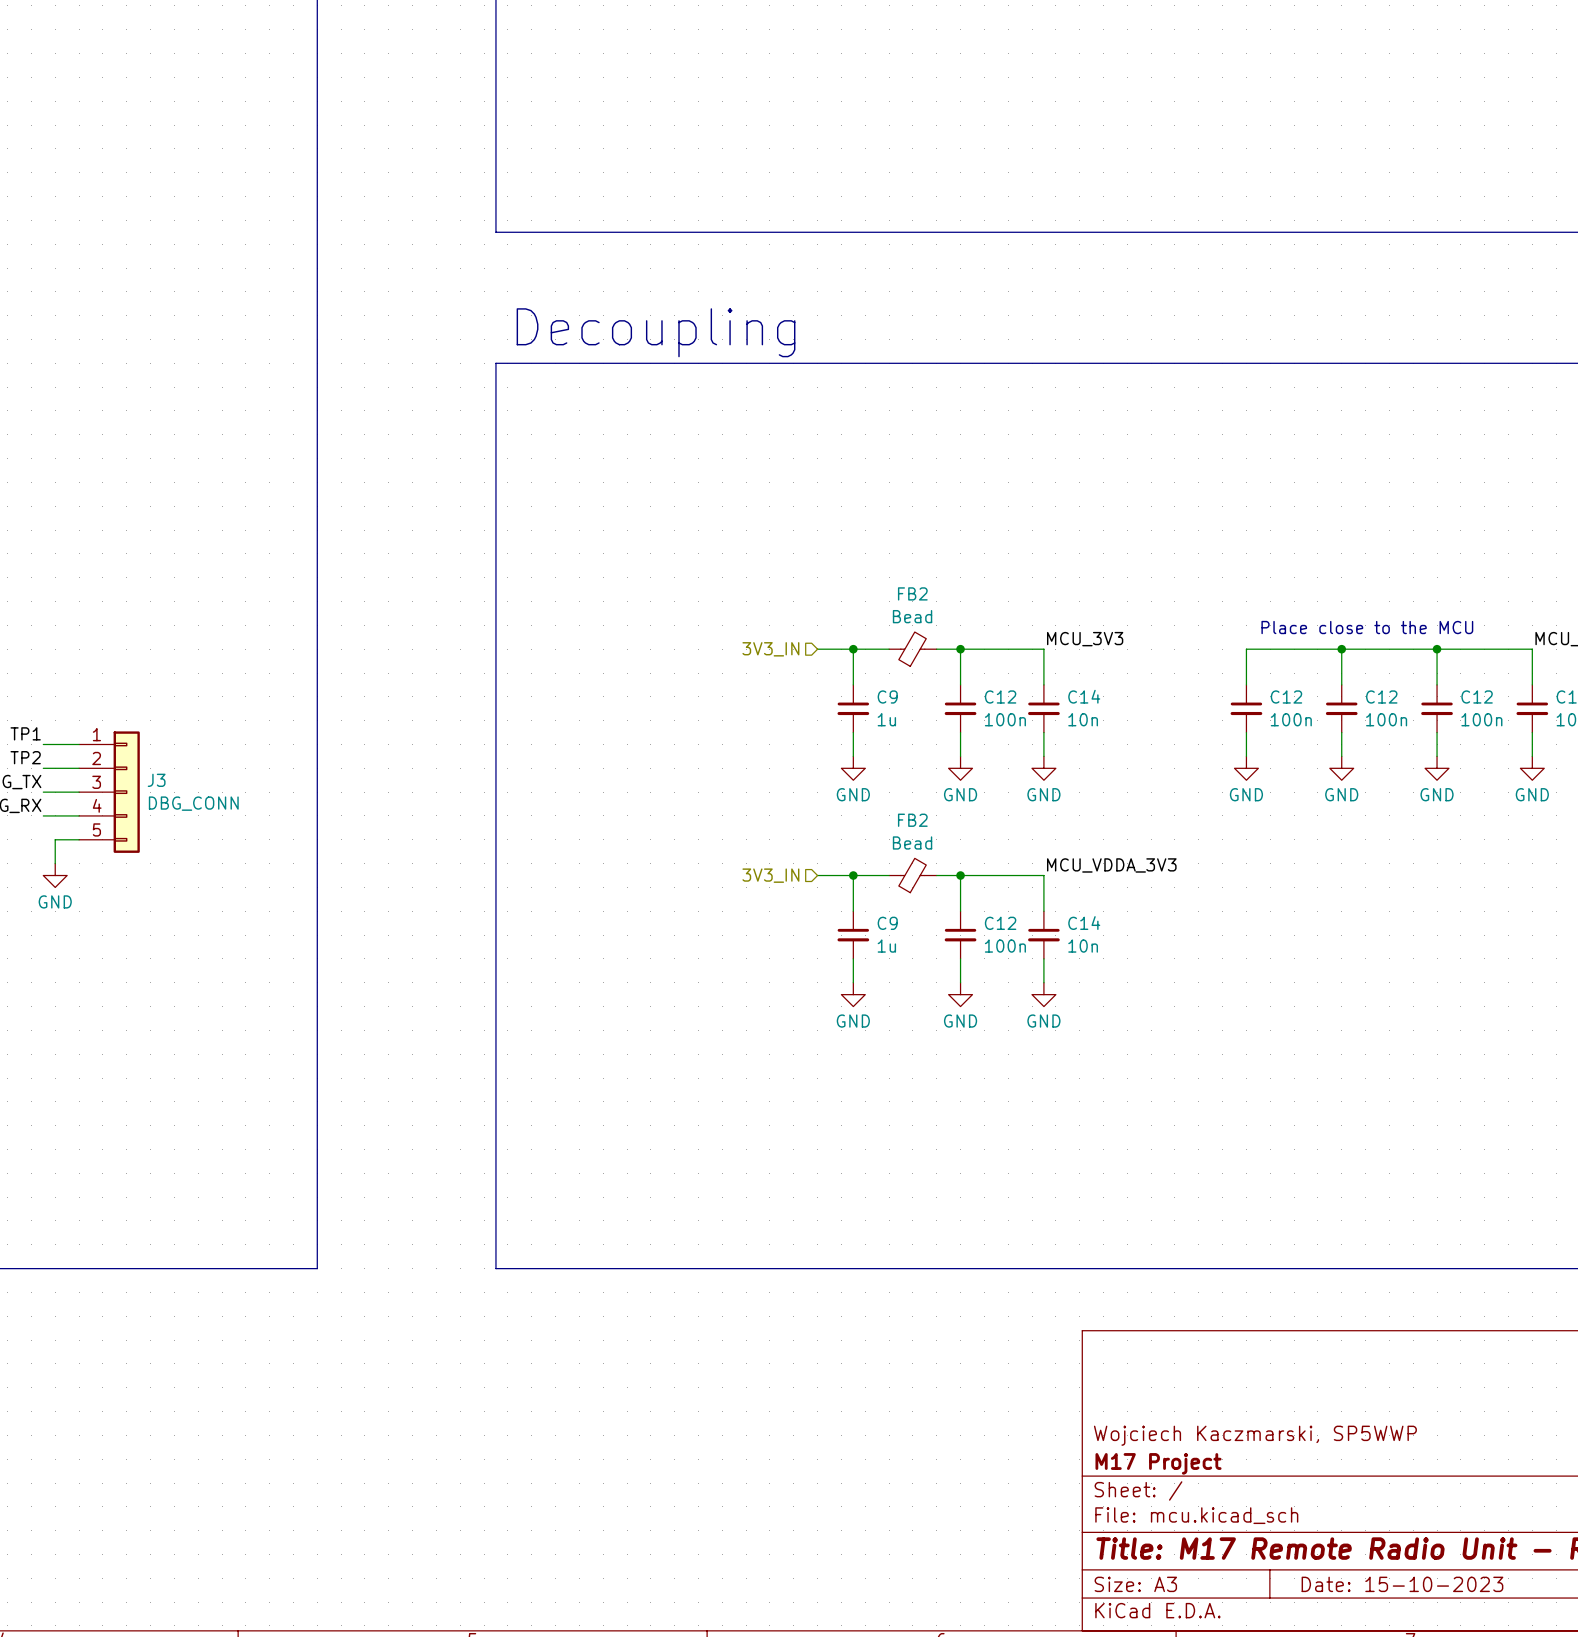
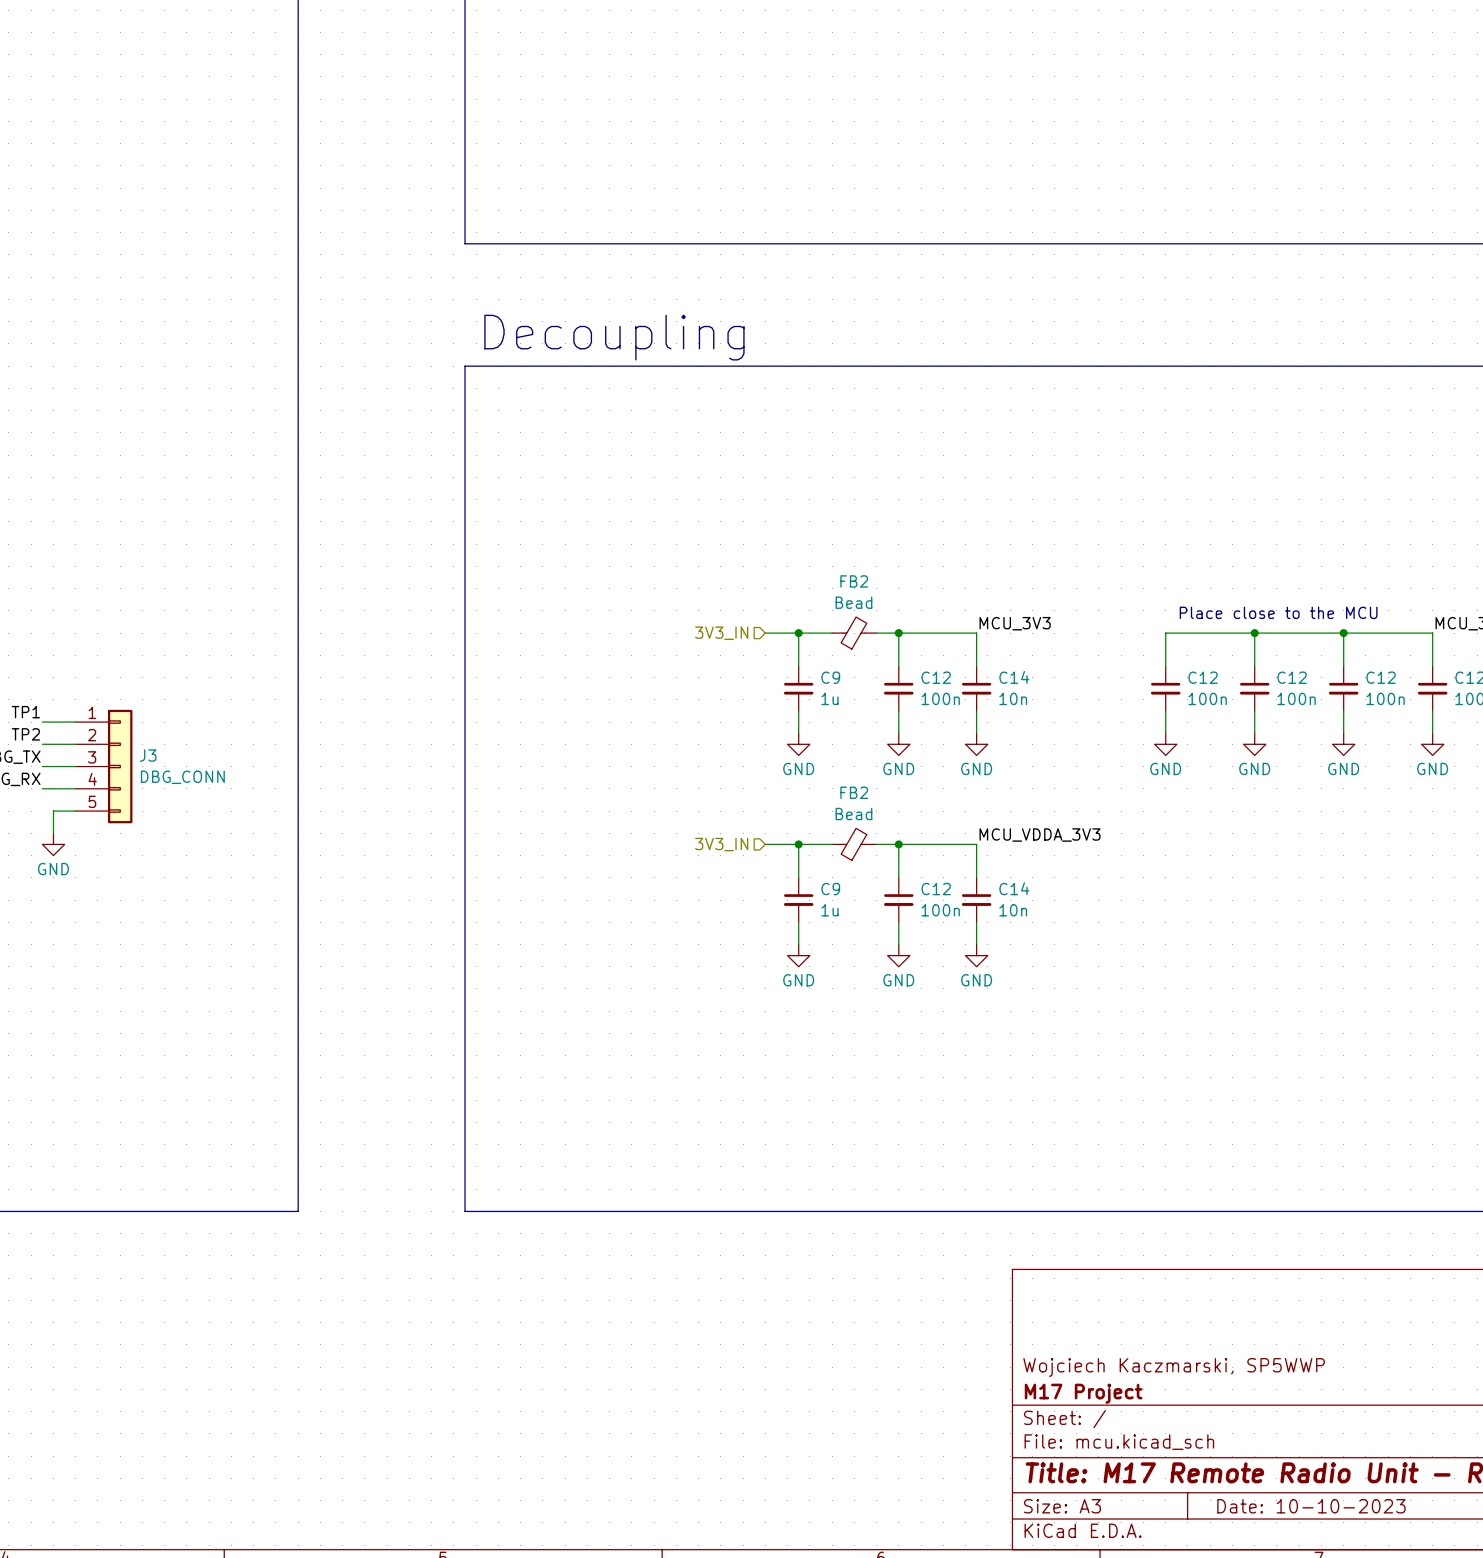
title block: Date: 15-10-2023 (1402, 1584) -> Date: 10-10-2023 (1311, 1506)

